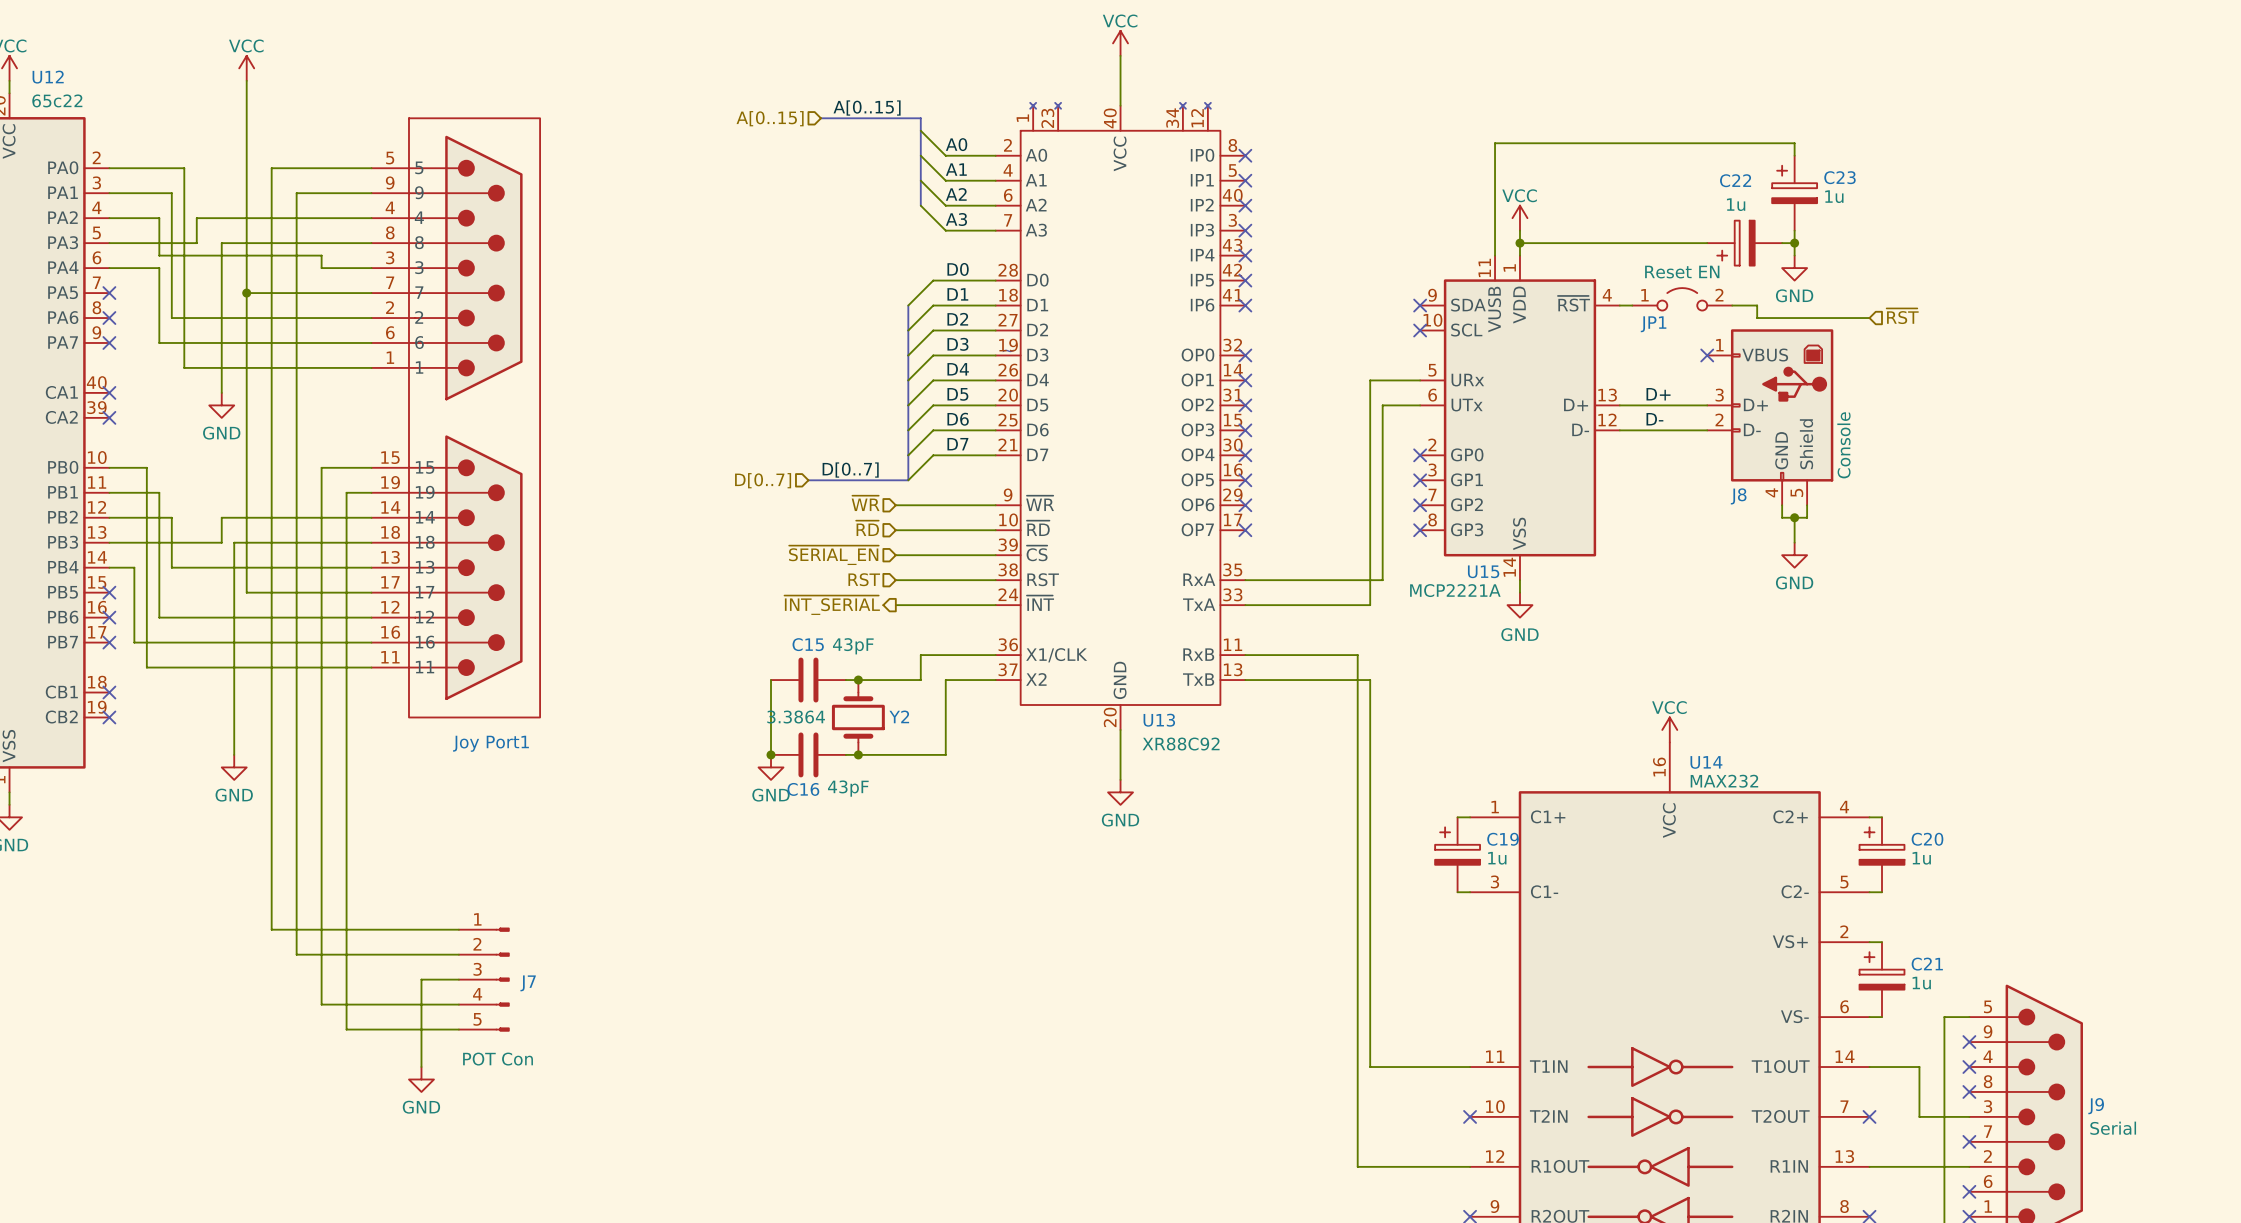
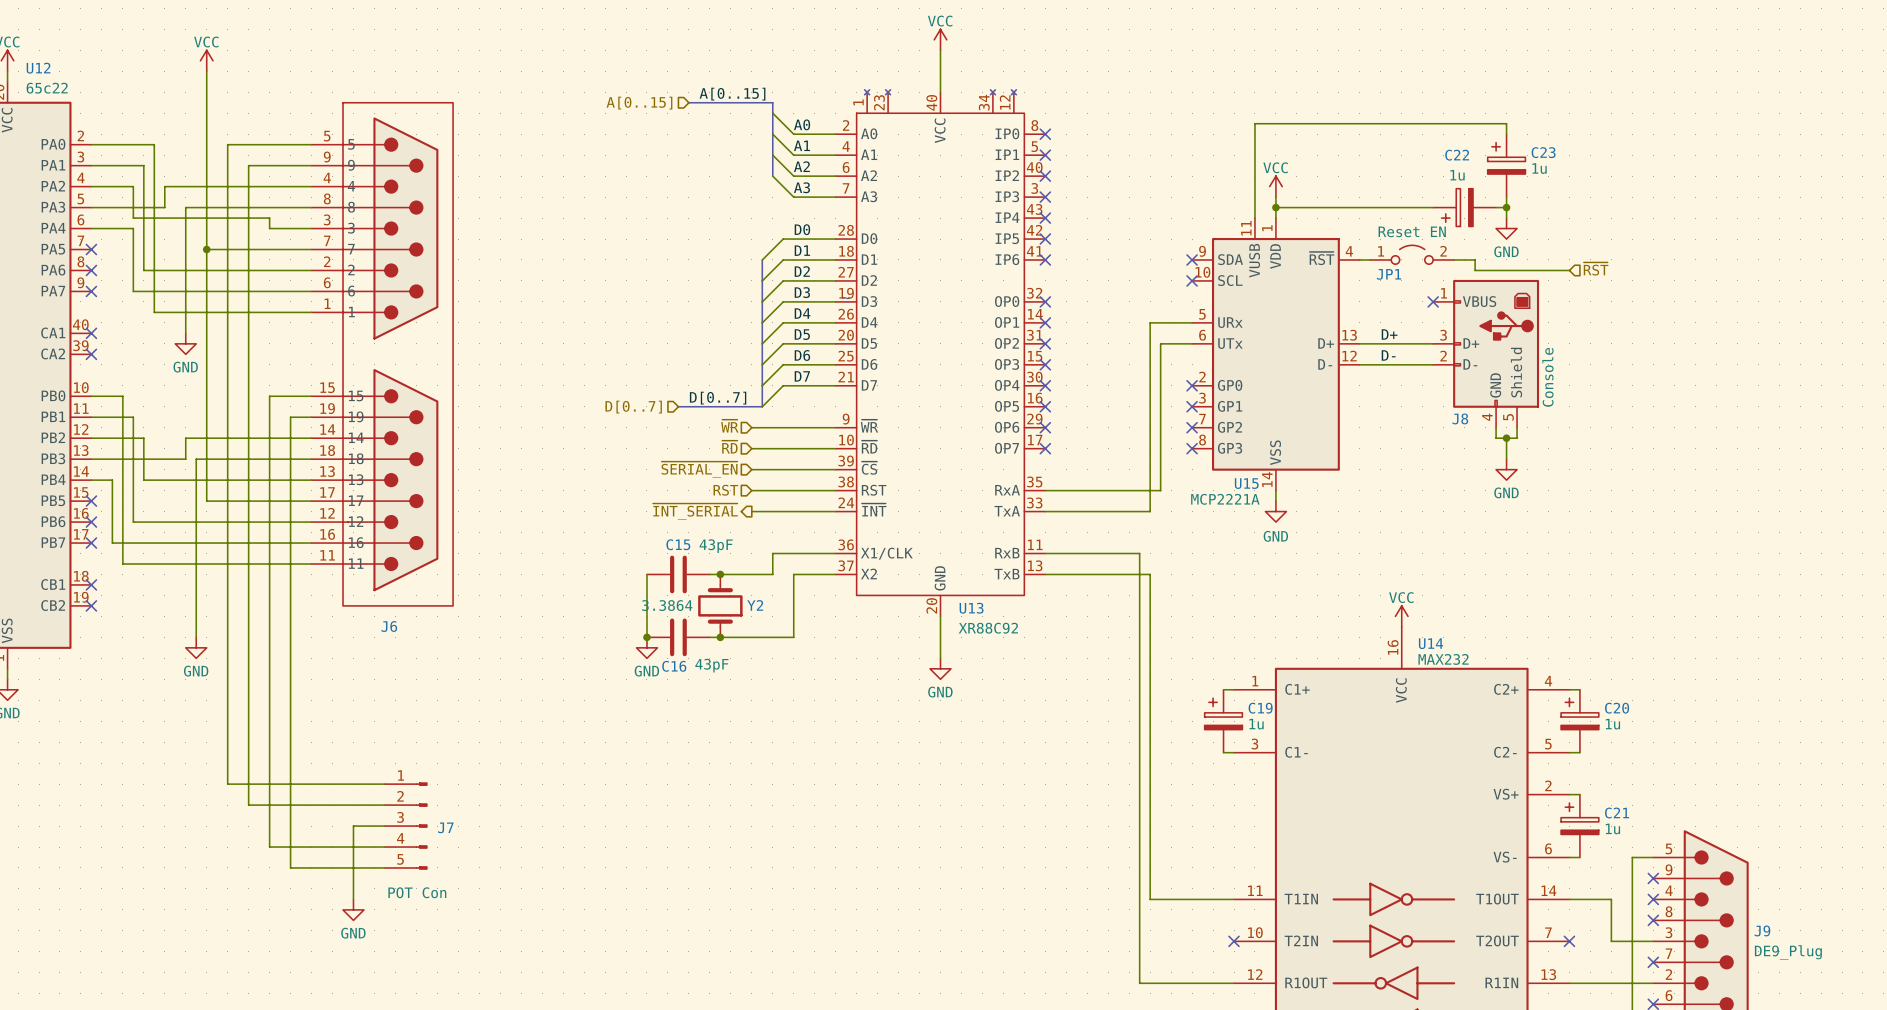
Joy Port1 name: Joy Port1 (490, 743) -> J6 (389, 626)
J9 value: Serial (2113, 1128) -> DE9_Plug (1788, 952)

